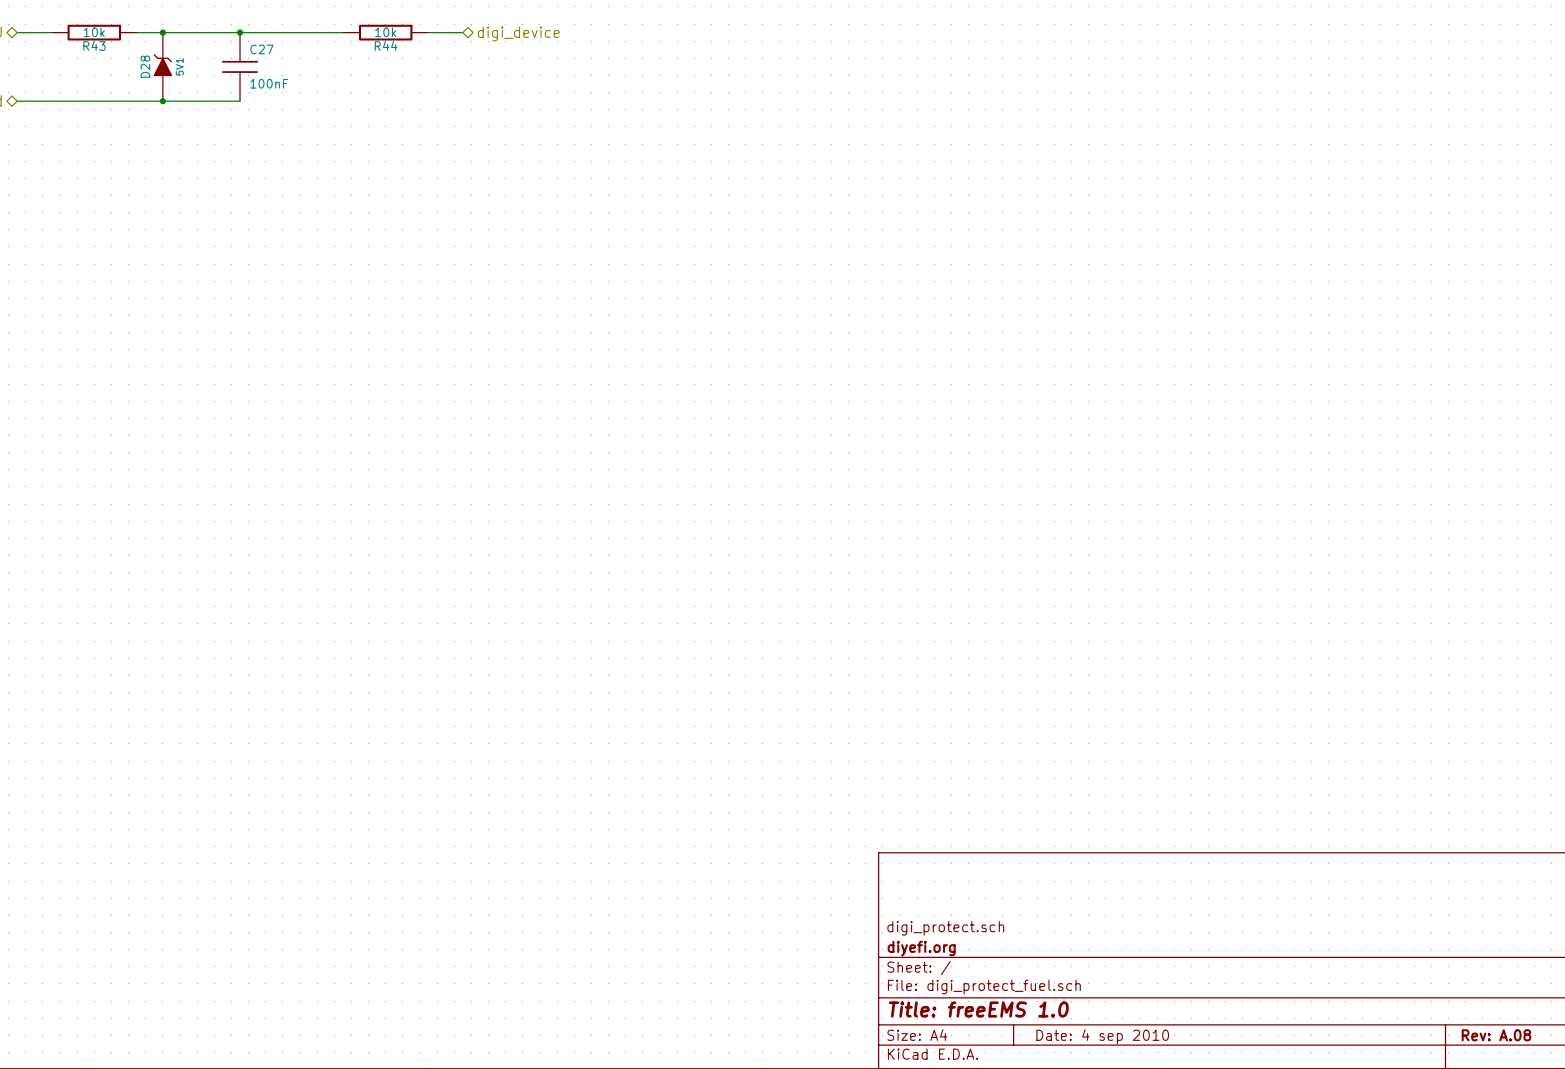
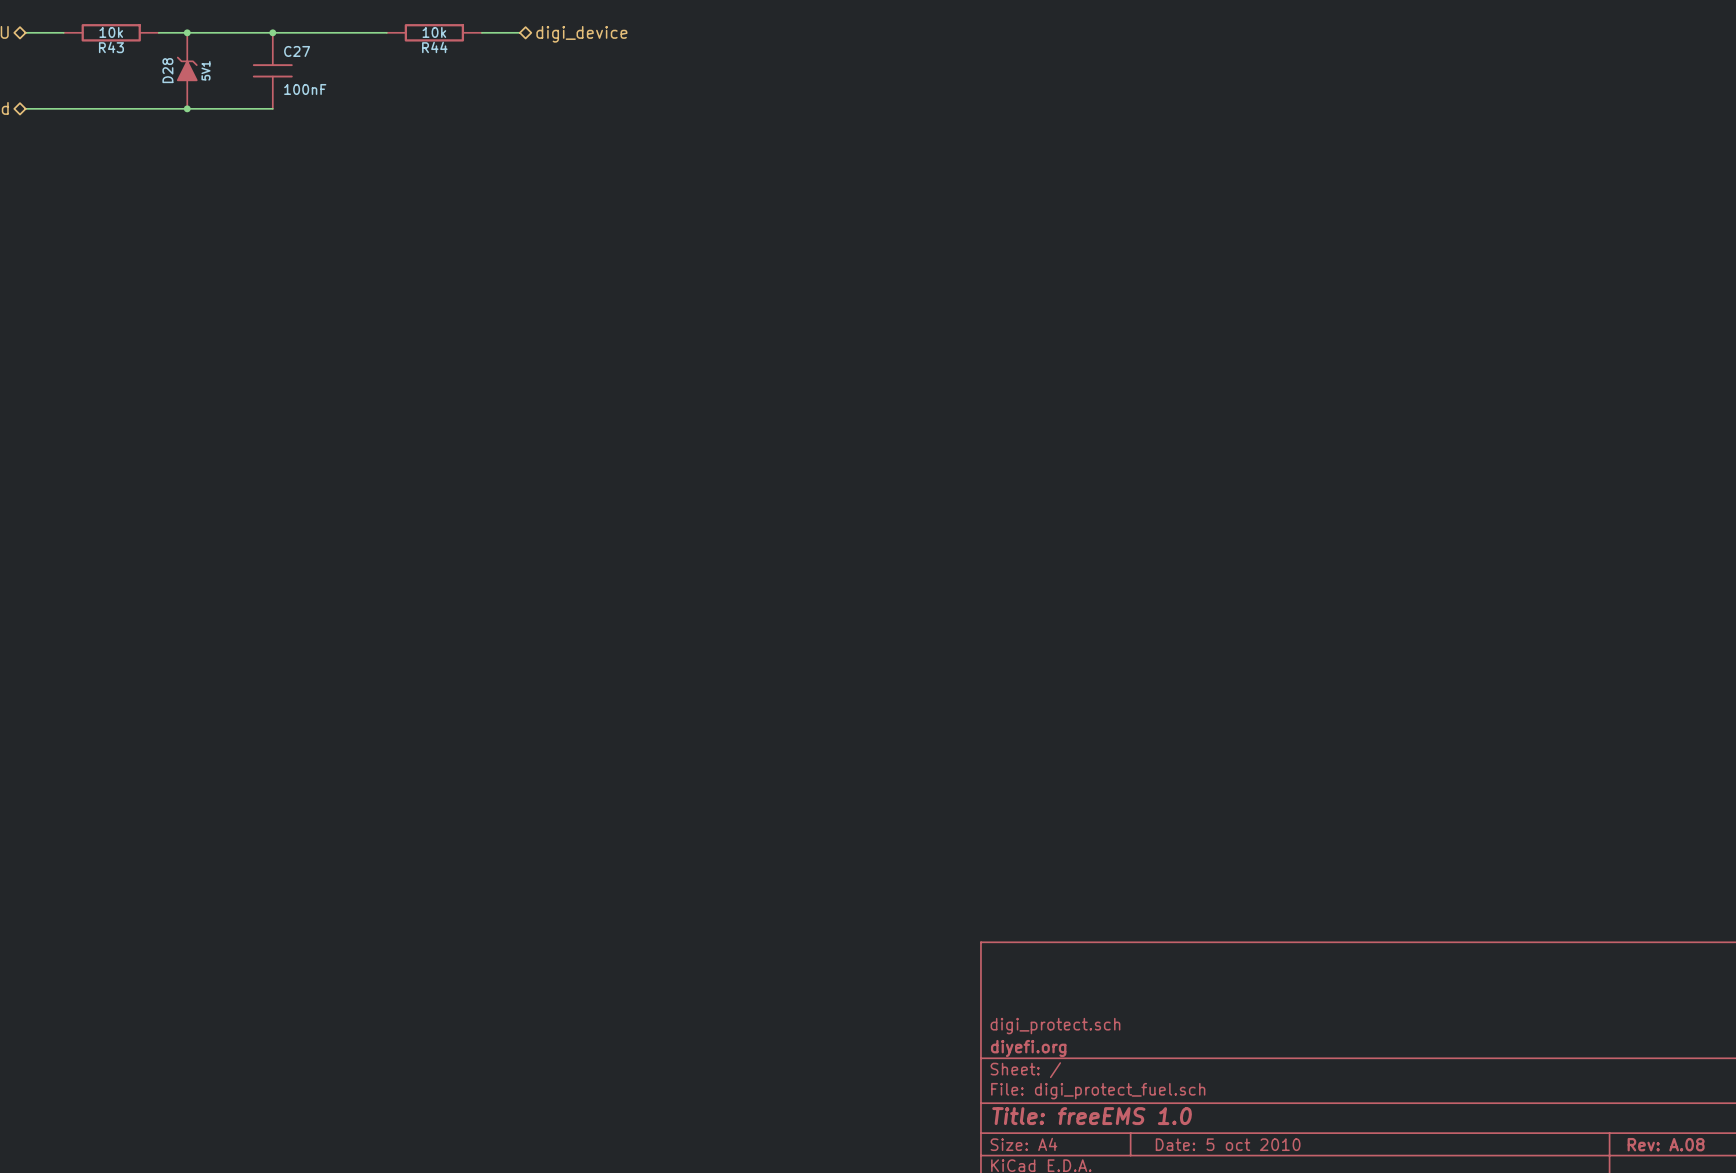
title block: Date: 4 sep 2010 (1102, 1036) -> Date: 5 oct 2010 (1228, 1144)

